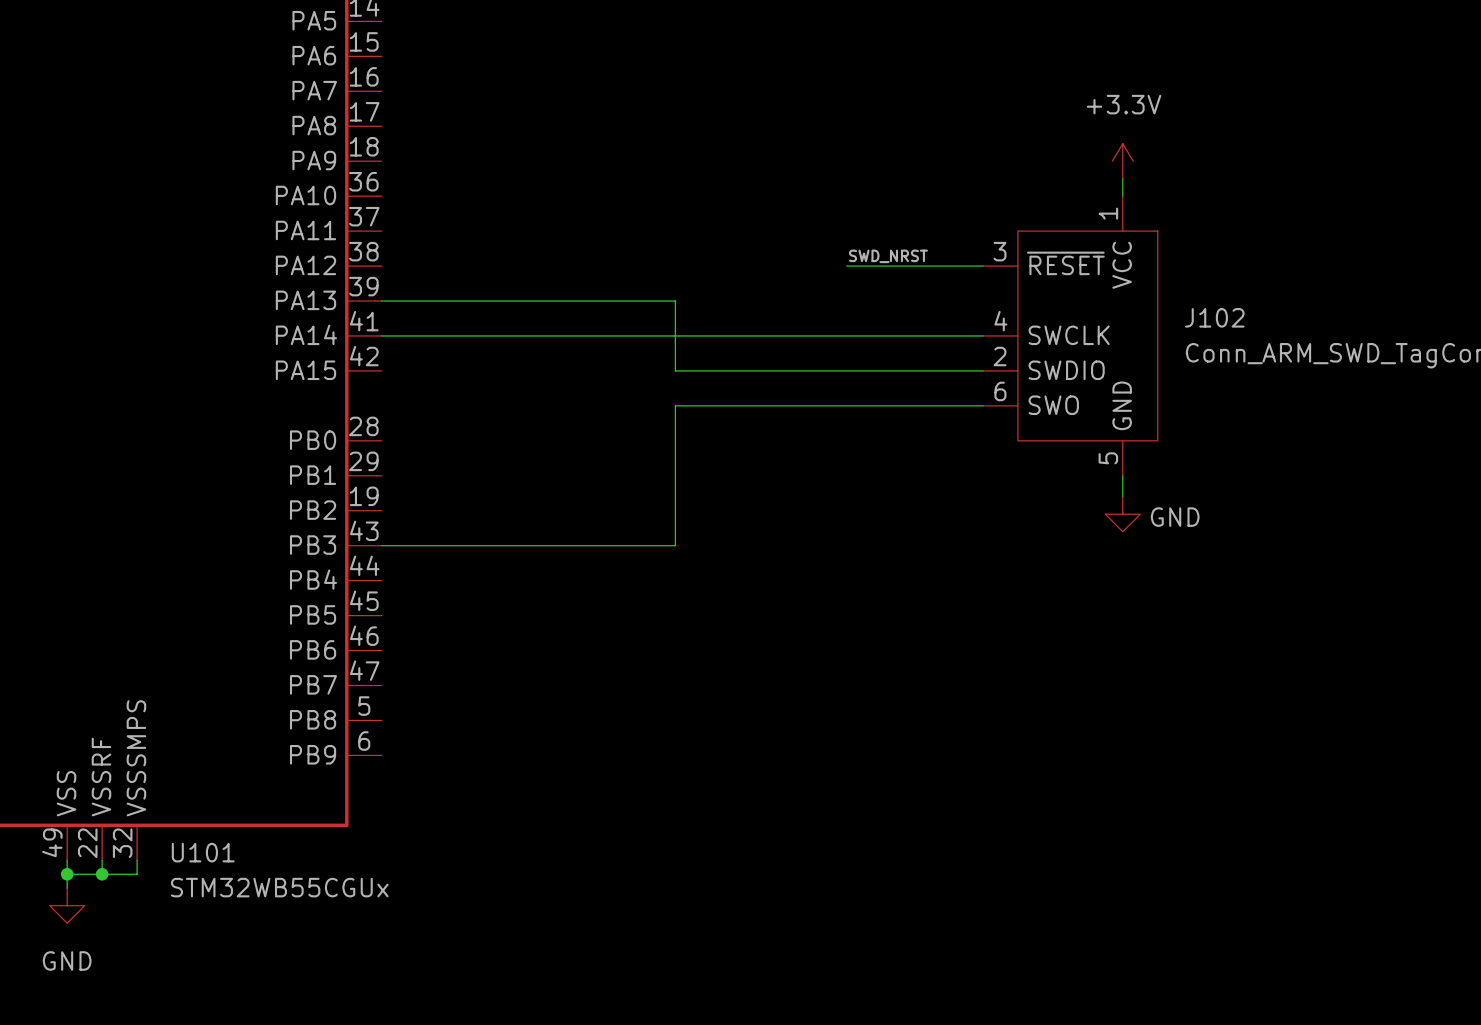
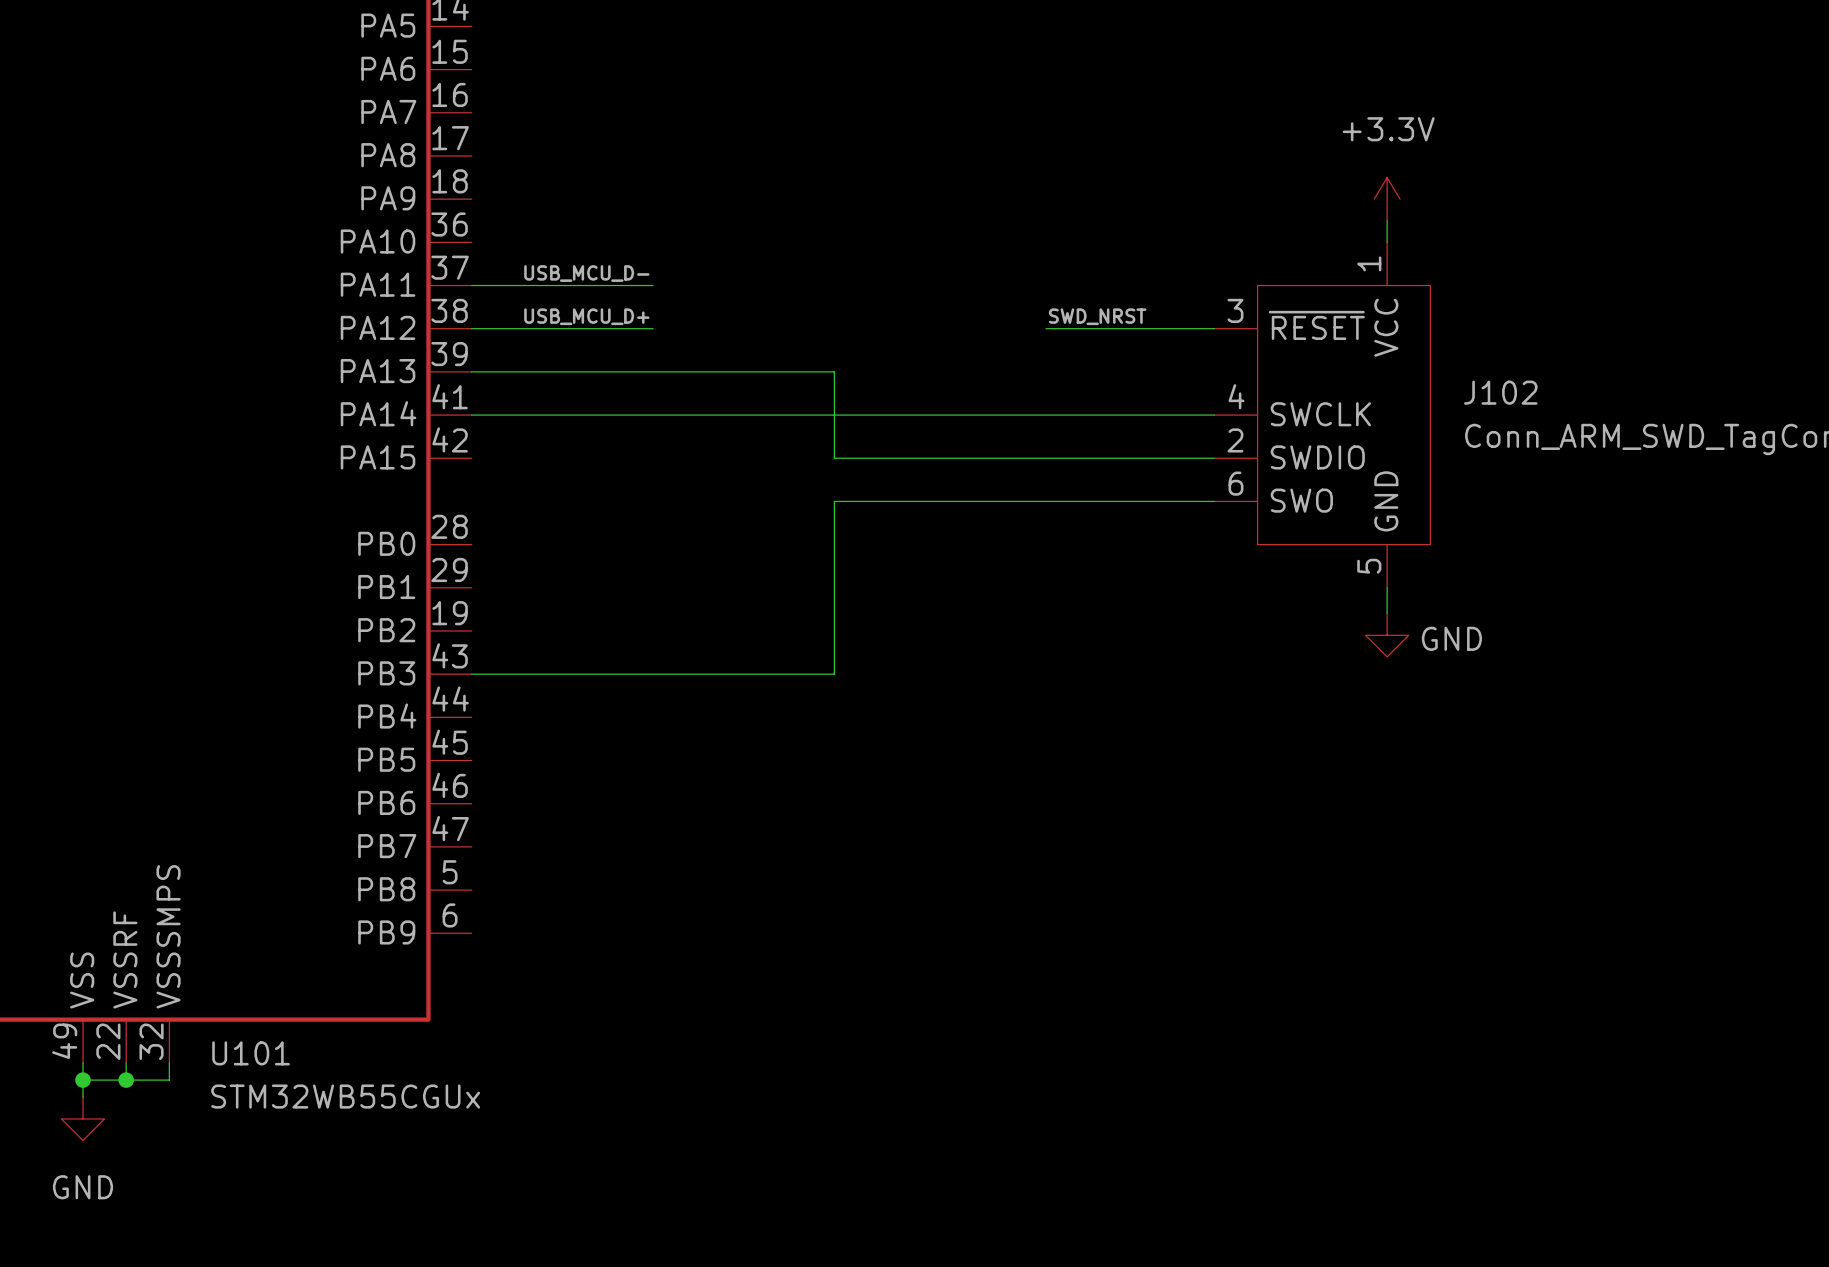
label: none -> USB_MCU_D- (586, 273)
wire: none -> (471, 285) (653, 285)
label: none -> USB_MCU_D+ (586, 316)
wire: none -> (471, 328) (653, 328)

